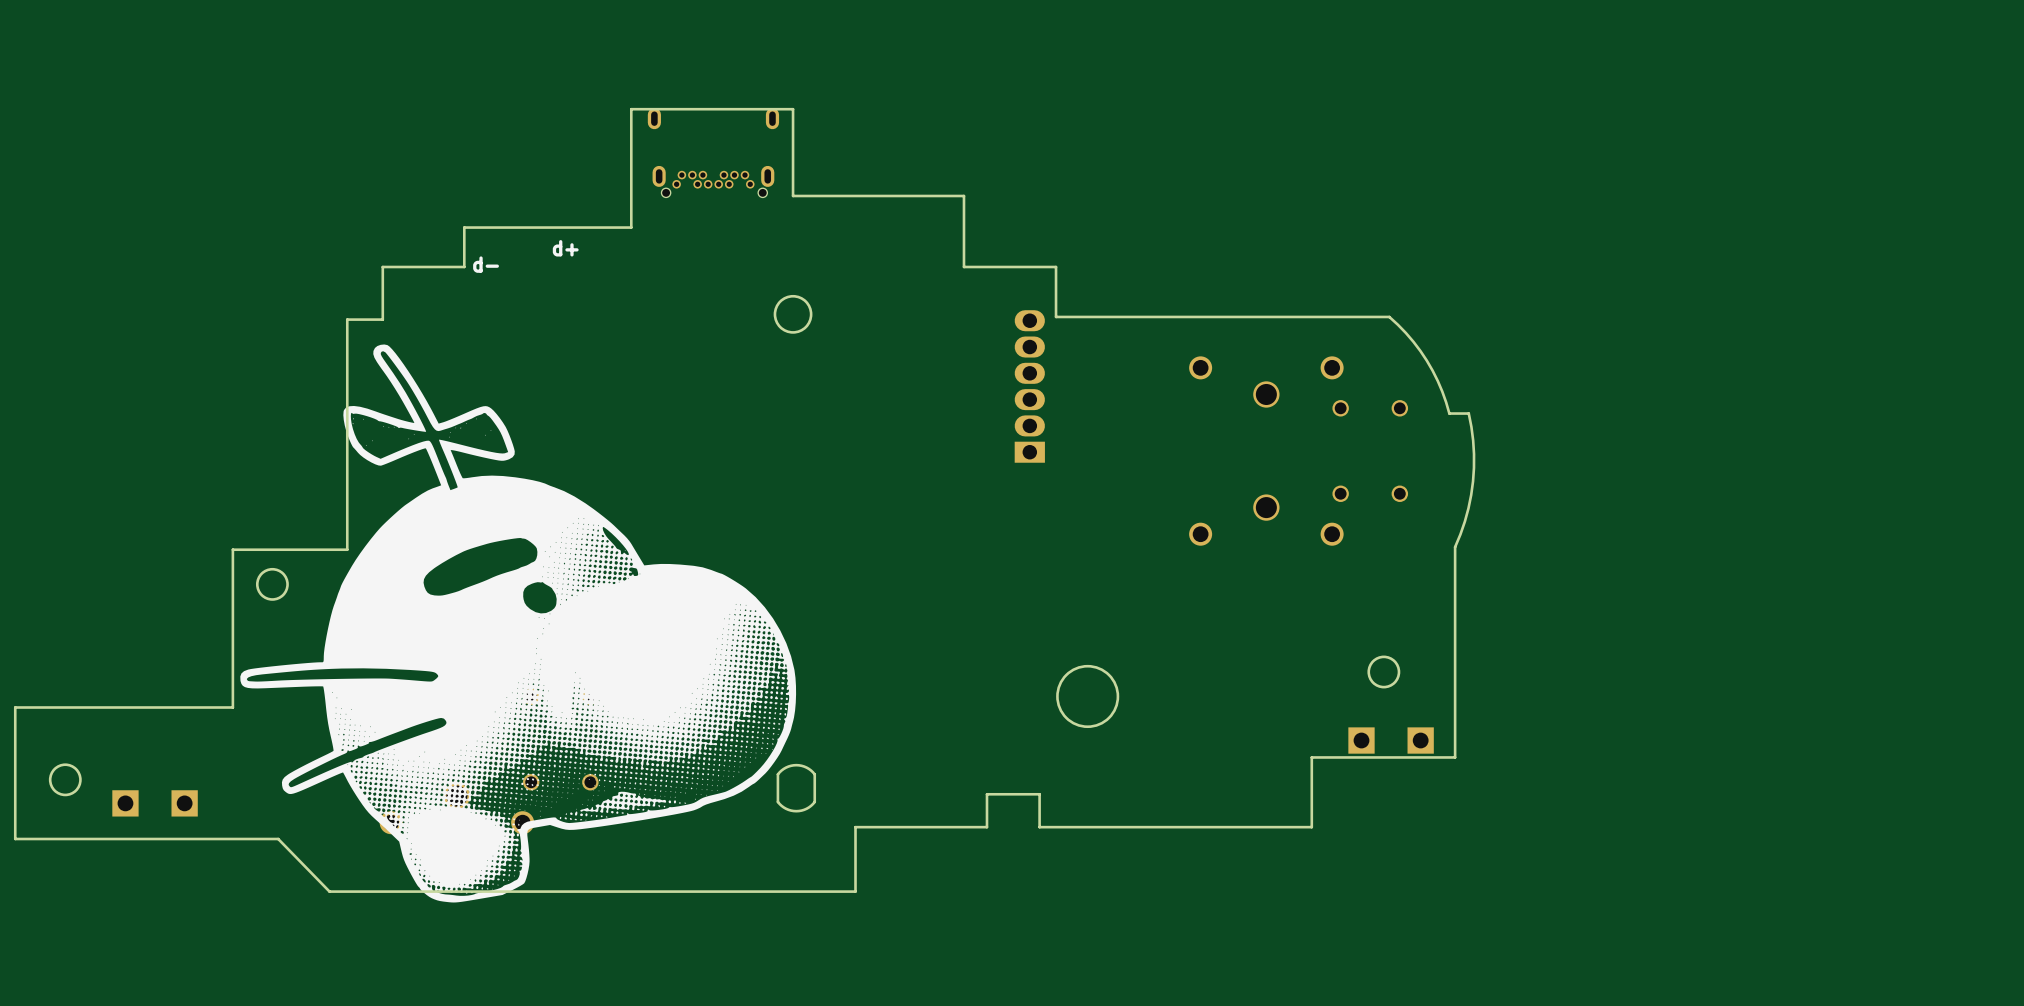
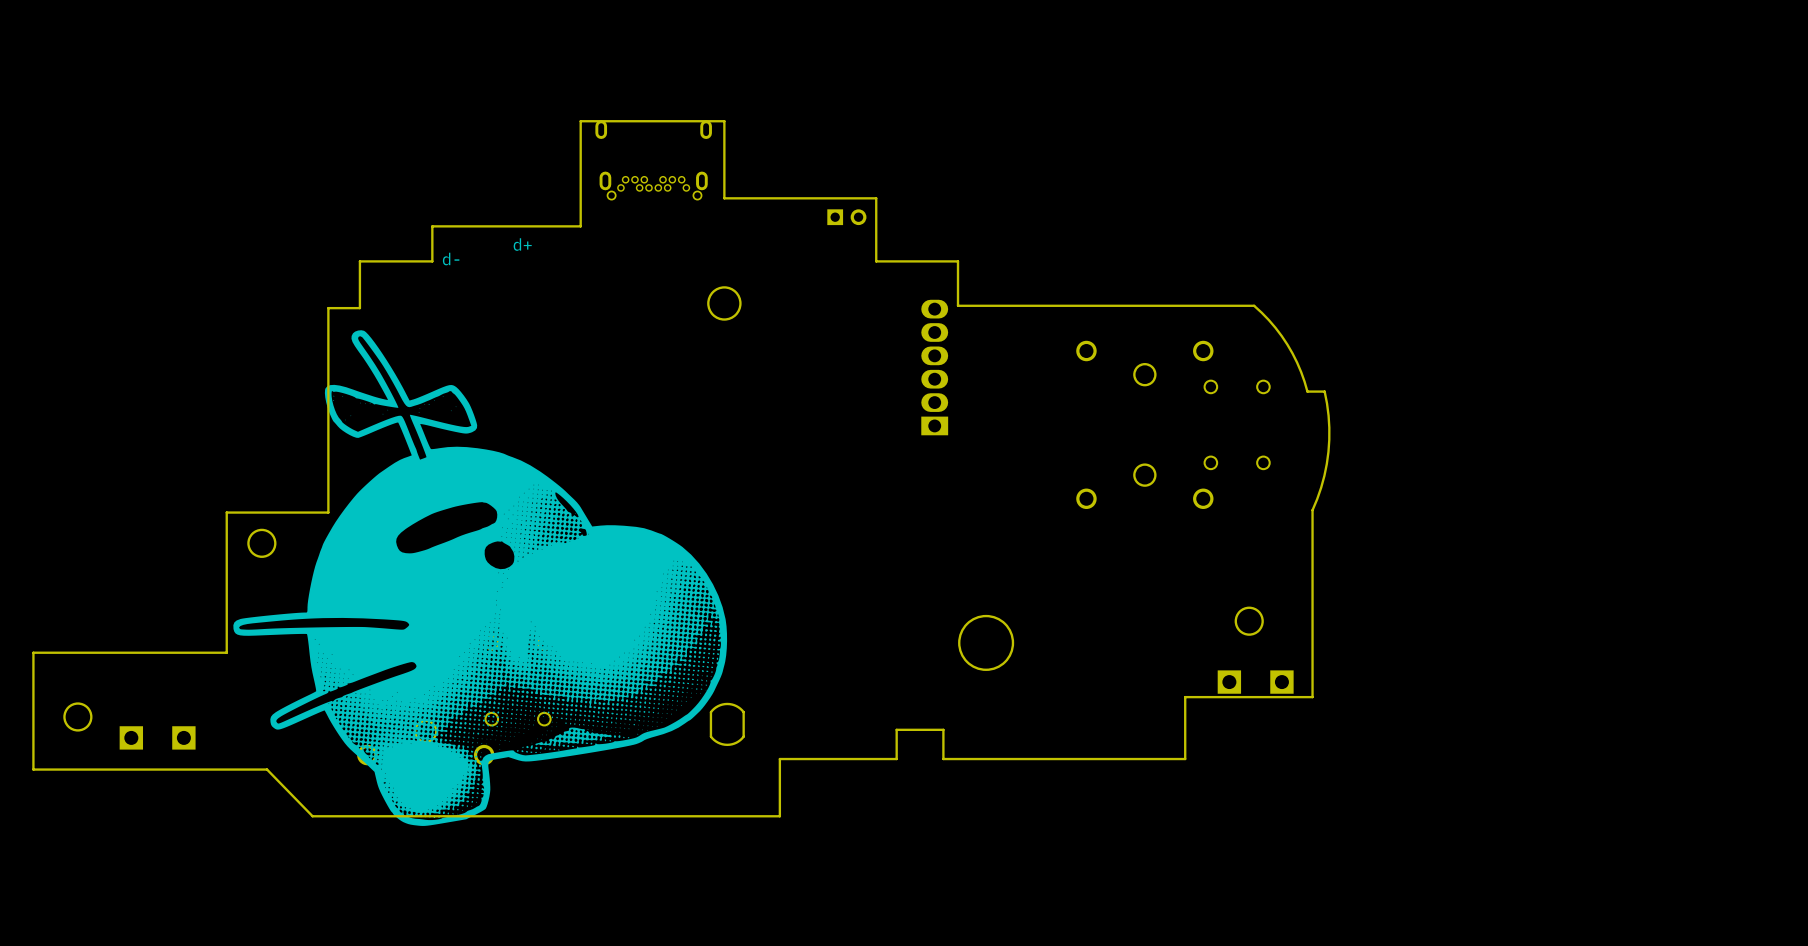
part: none -> (846, 217)

